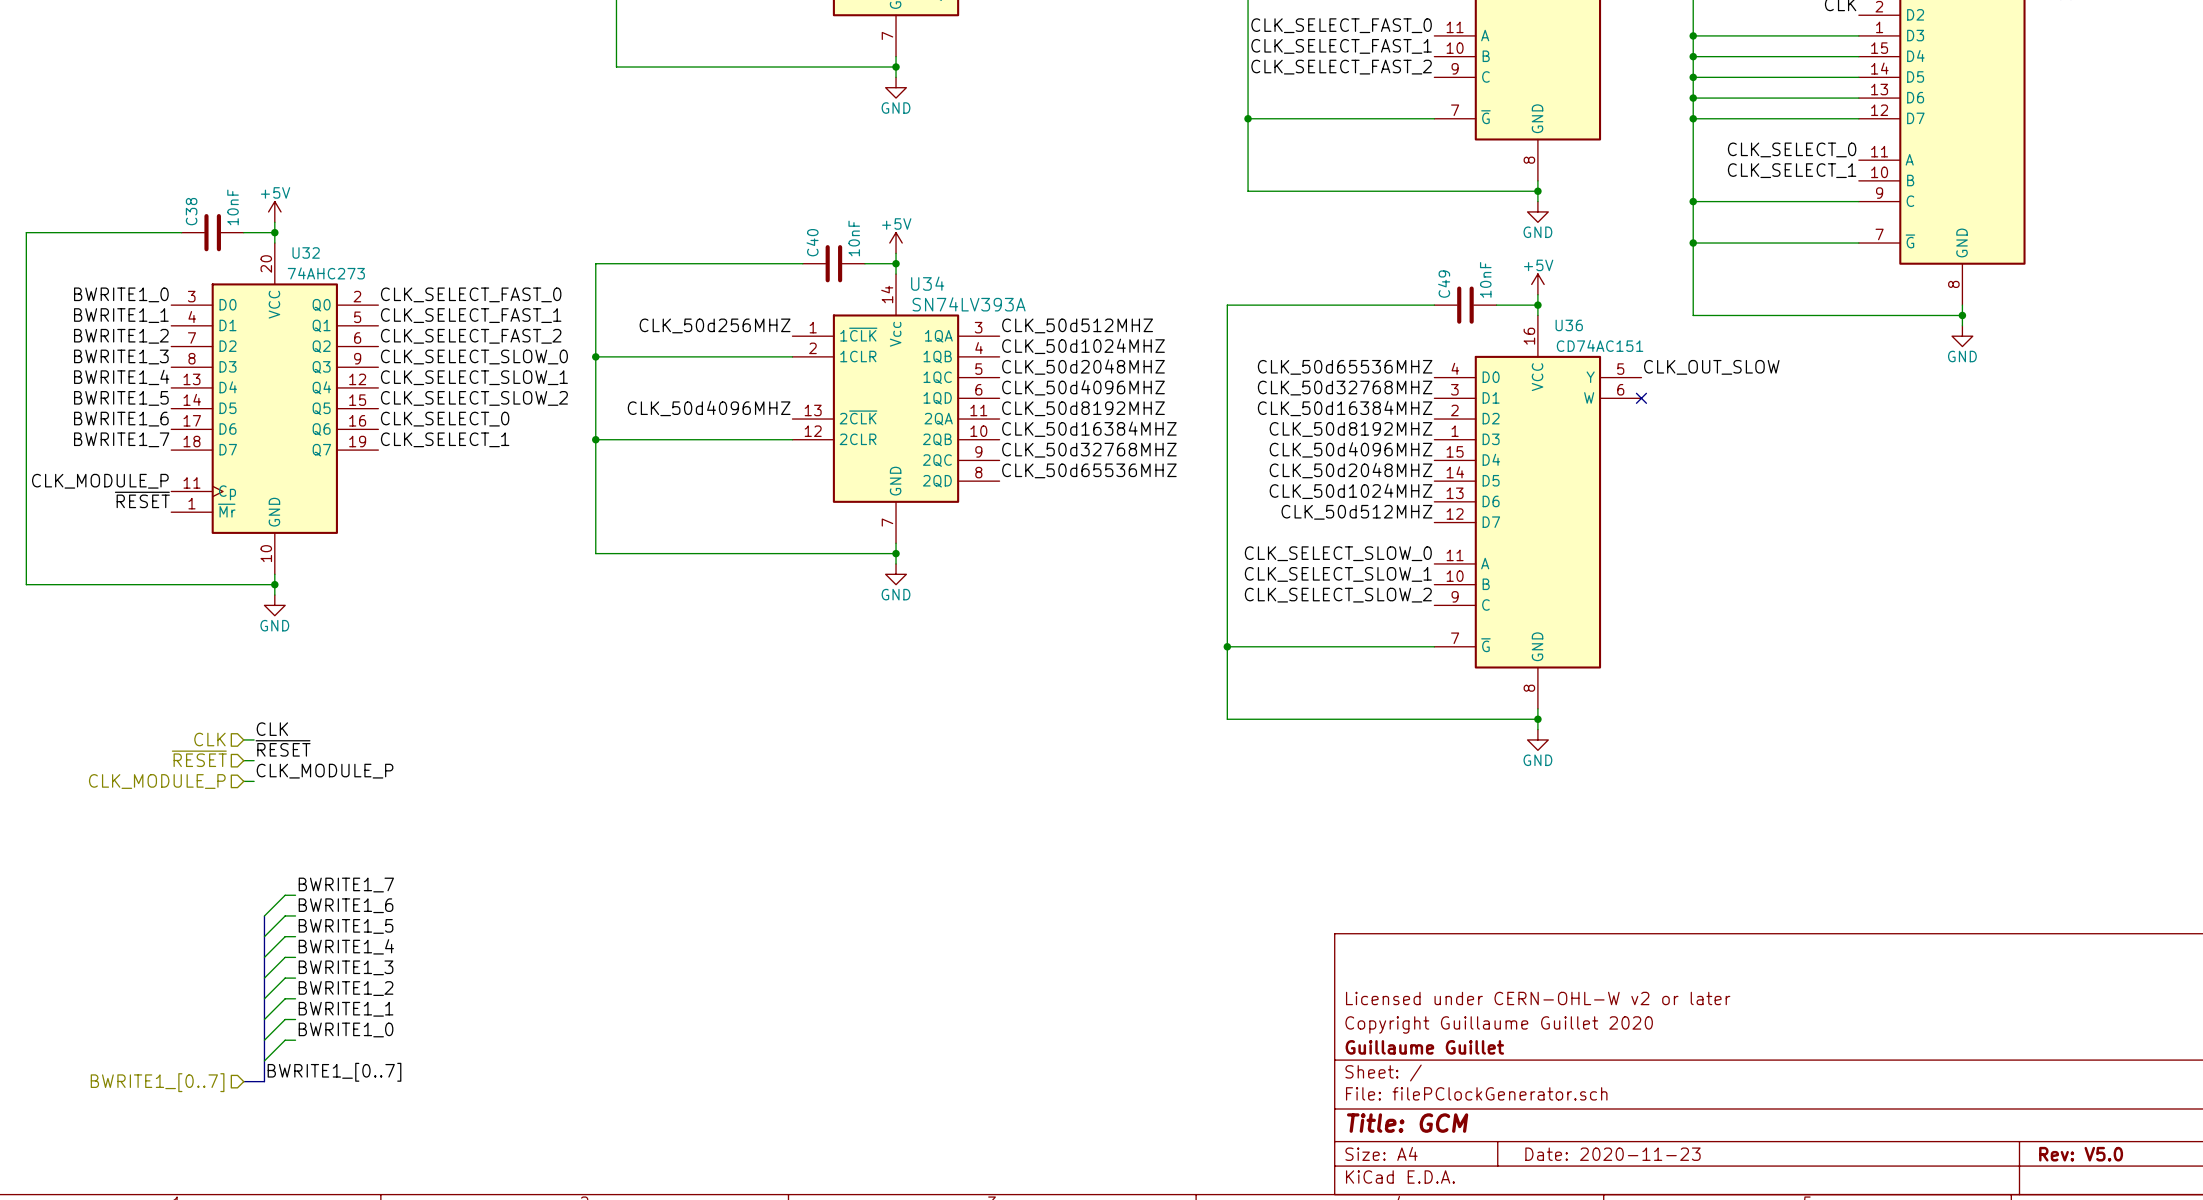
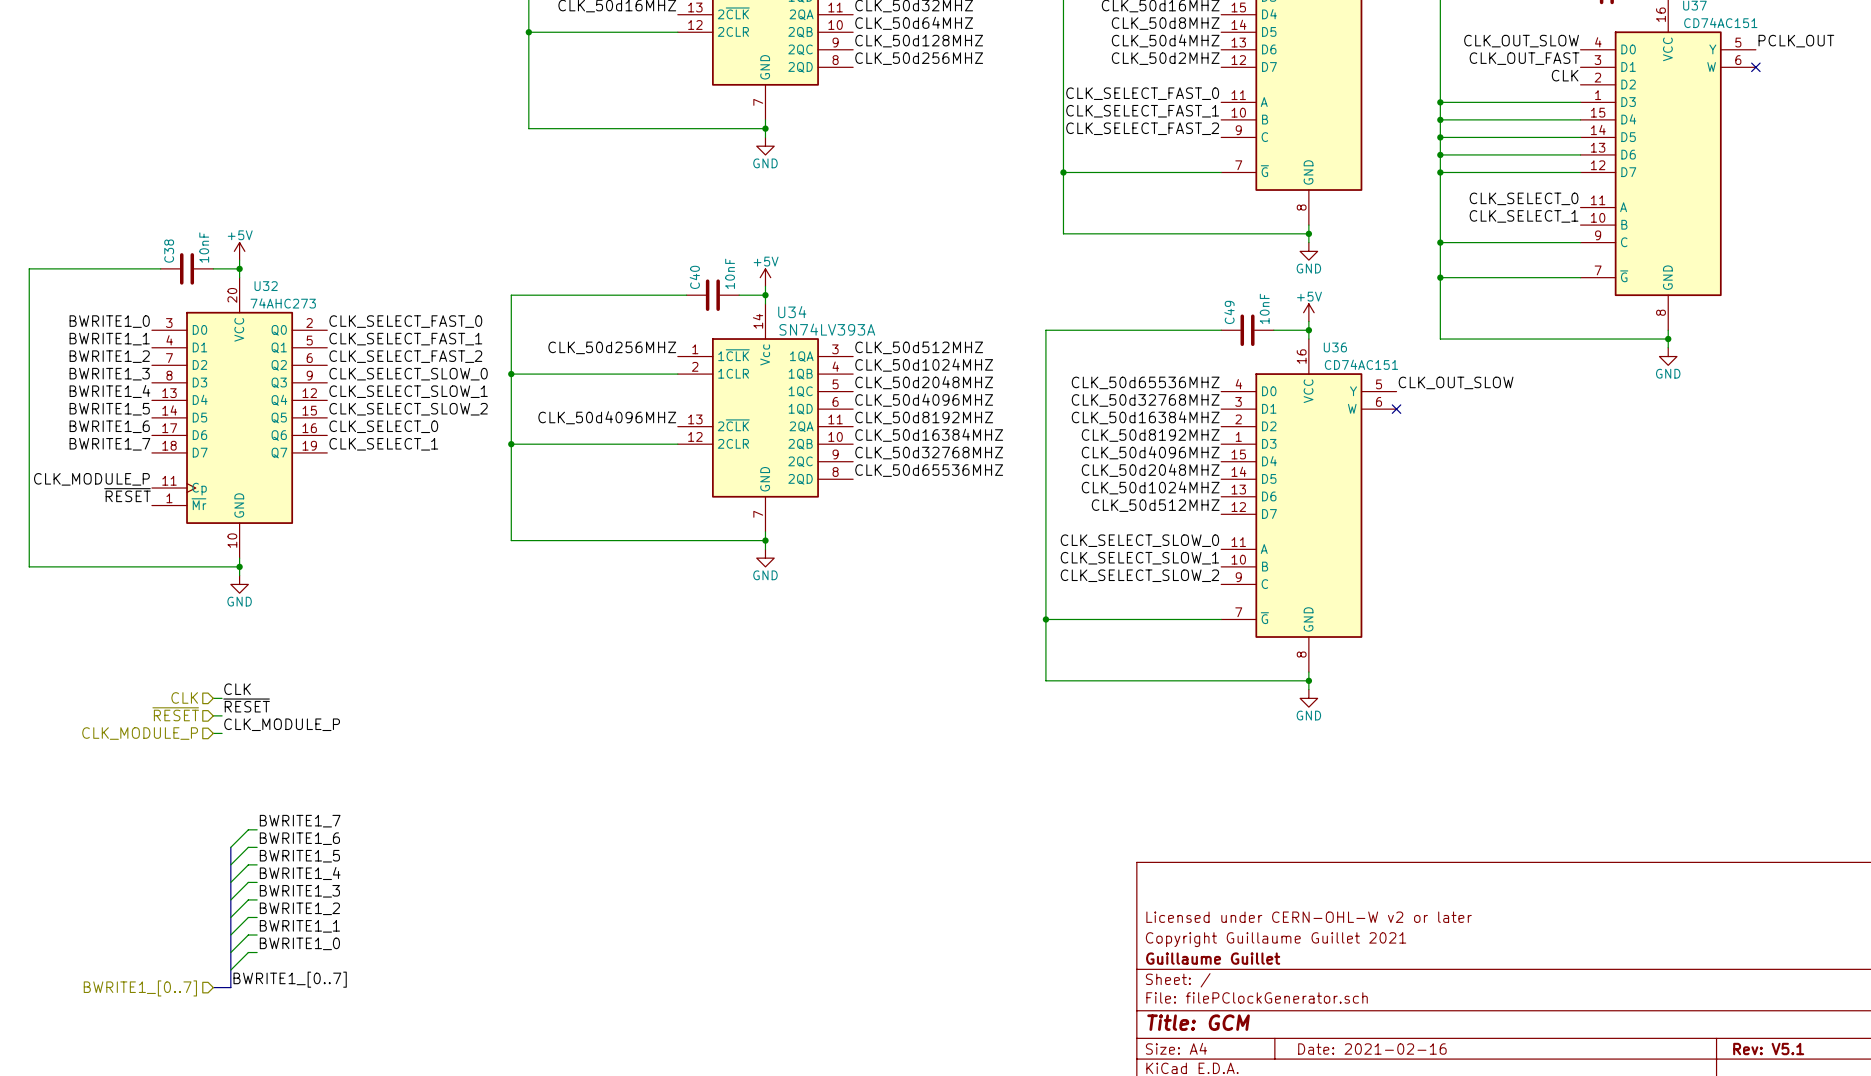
title block: Copyright Guillaume Guillet 2020 (1499, 1024) -> Copyright Guillaume Guillet 2021 (1276, 939)
title block: Date: 2020-11-23 (1612, 1154) -> Date: 2021-02-16 (1372, 1049)
title block: Rev: V5.0 (2081, 1154) -> Rev: V5.1 (1768, 1049)

